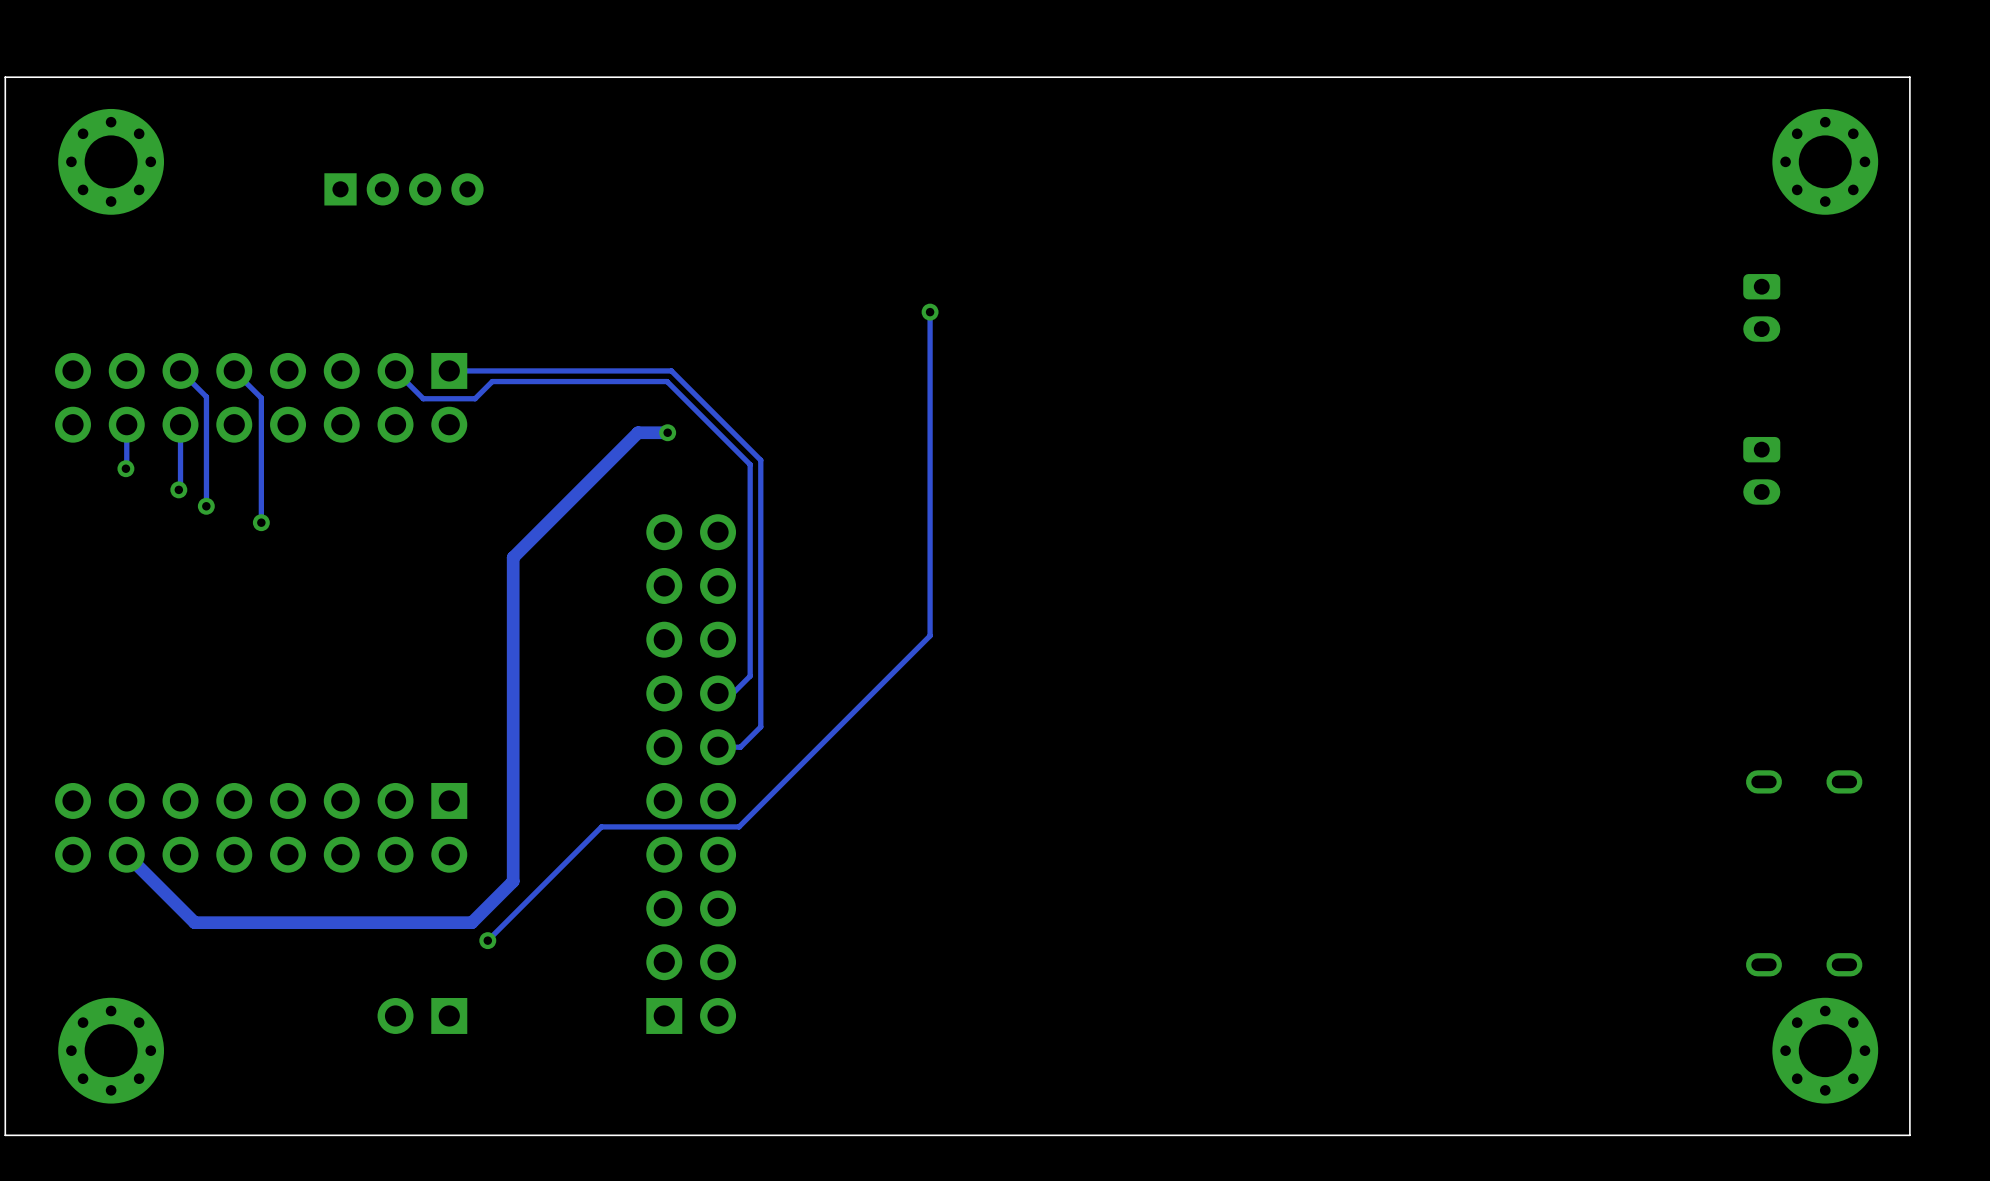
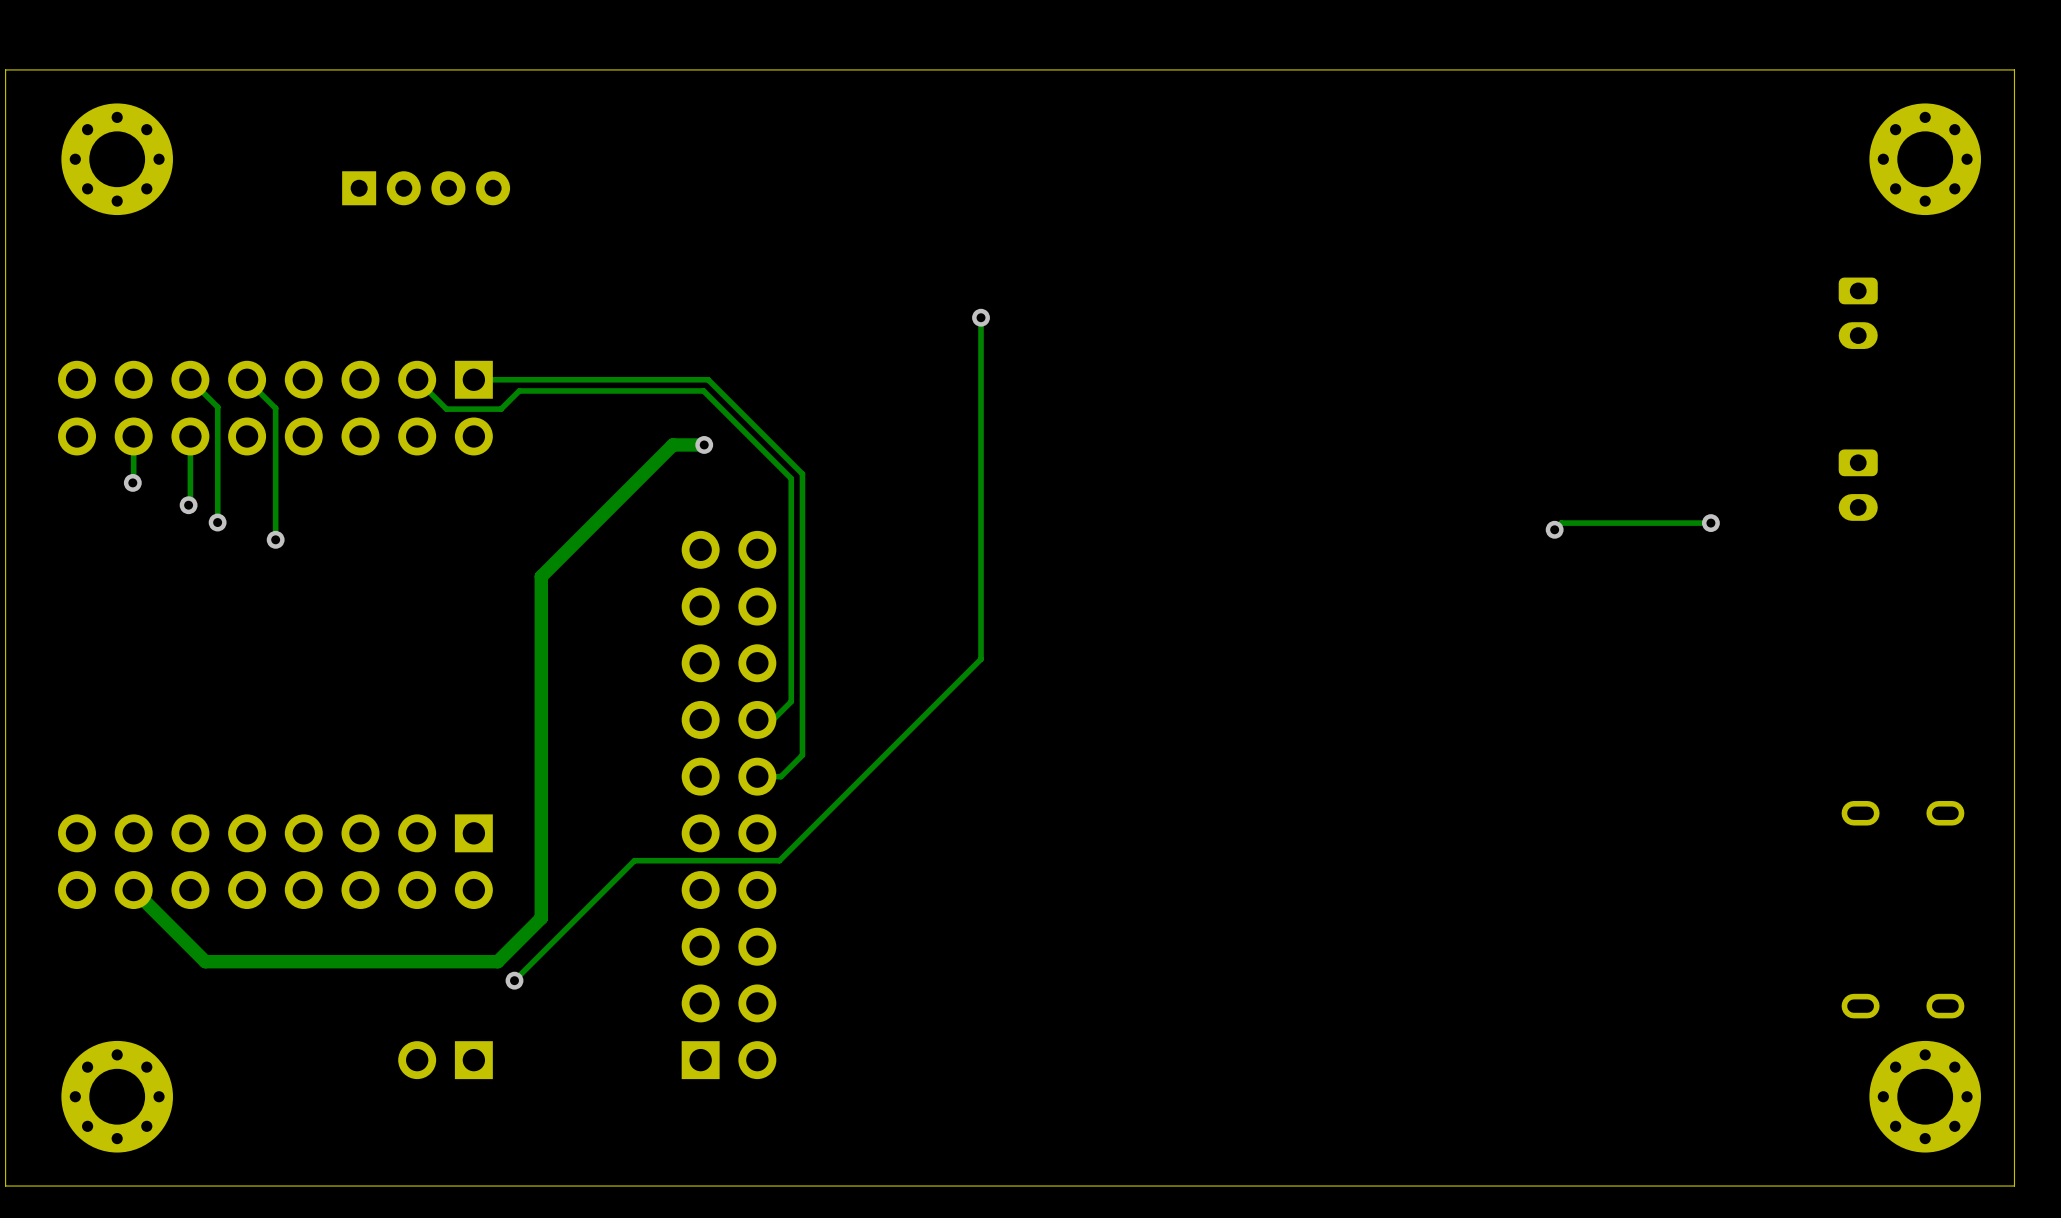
track: none -> (1710, 523) (1561, 523) (1554, 529)
via: none -> (1710, 523)
via: none -> (1554, 529)

